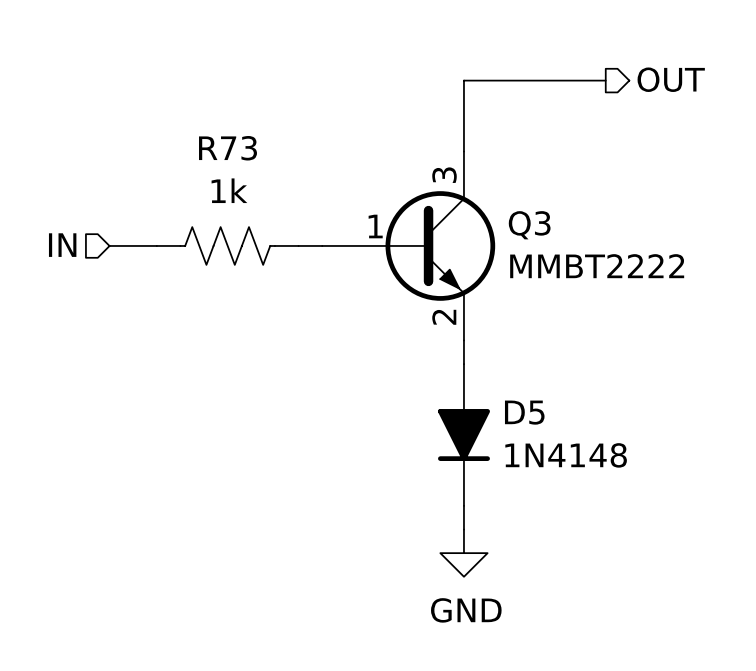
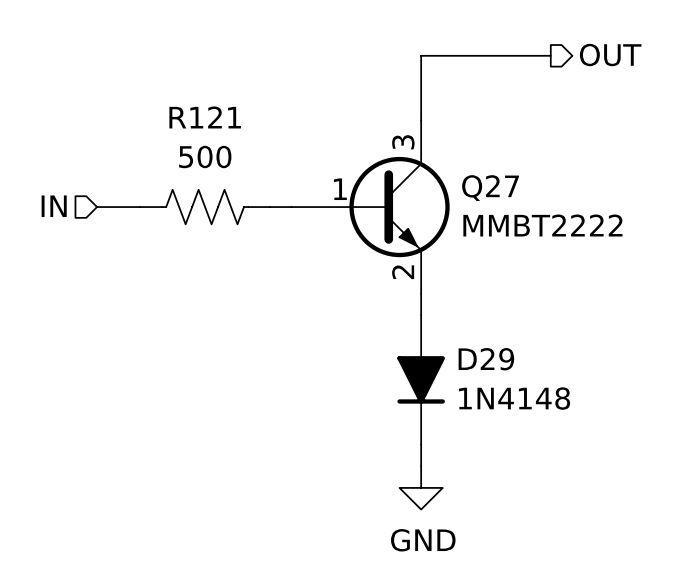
R73 name: R73 (228, 148) -> R121 (205, 117)
R73 value: 1k (229, 190) -> 500 (205, 156)
Q3 name: Q3 (529, 225) -> Q27 (490, 188)
D5 name: D5 (524, 412) -> D29 (486, 359)

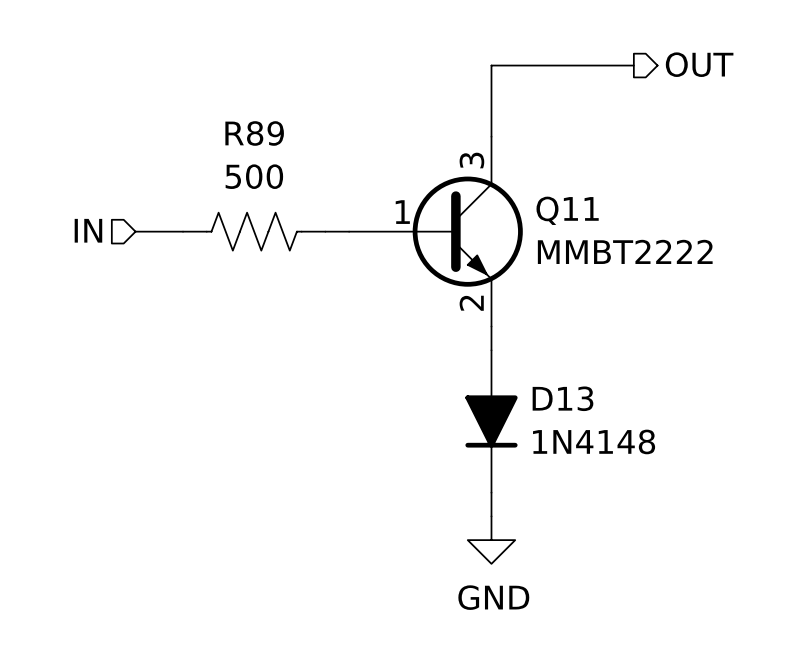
R121 name: R121 (205, 117) -> R89 (254, 133)
Q27 name: Q27 (490, 188) -> Q11 (567, 210)
D29 name: D29 (486, 359) -> D13 (562, 398)

